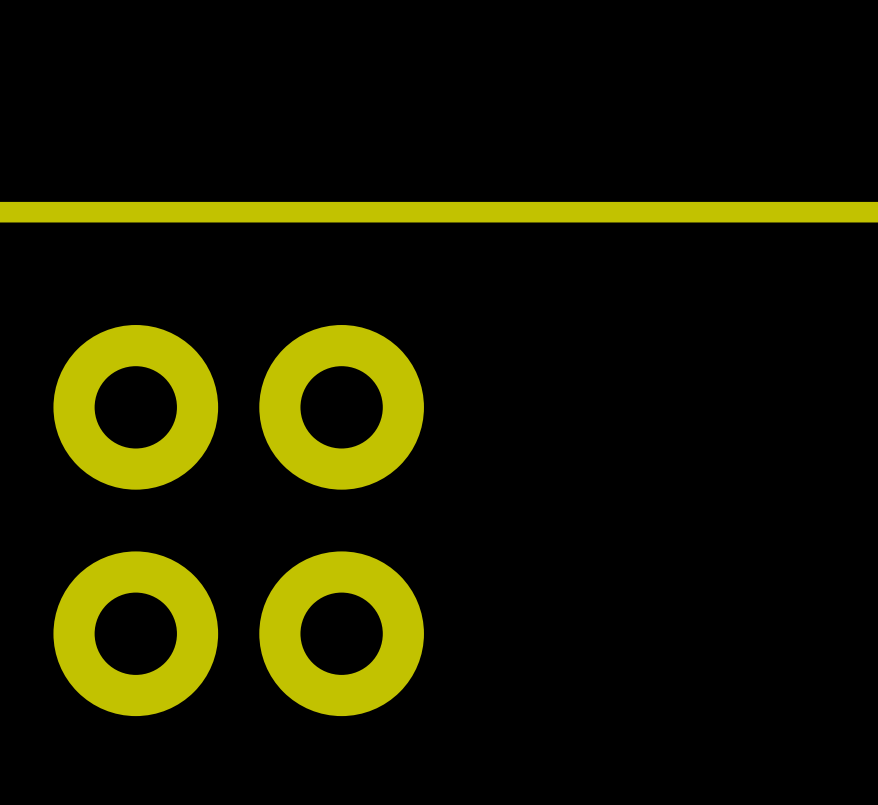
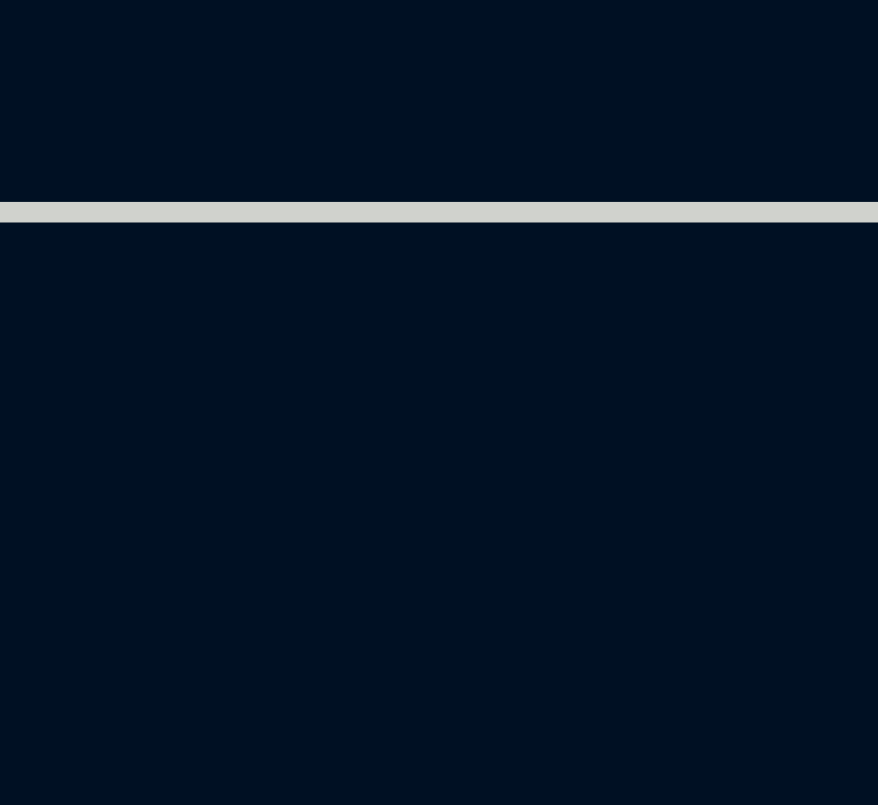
part: (135, 520) -> none
part: (341, 520) -> none

